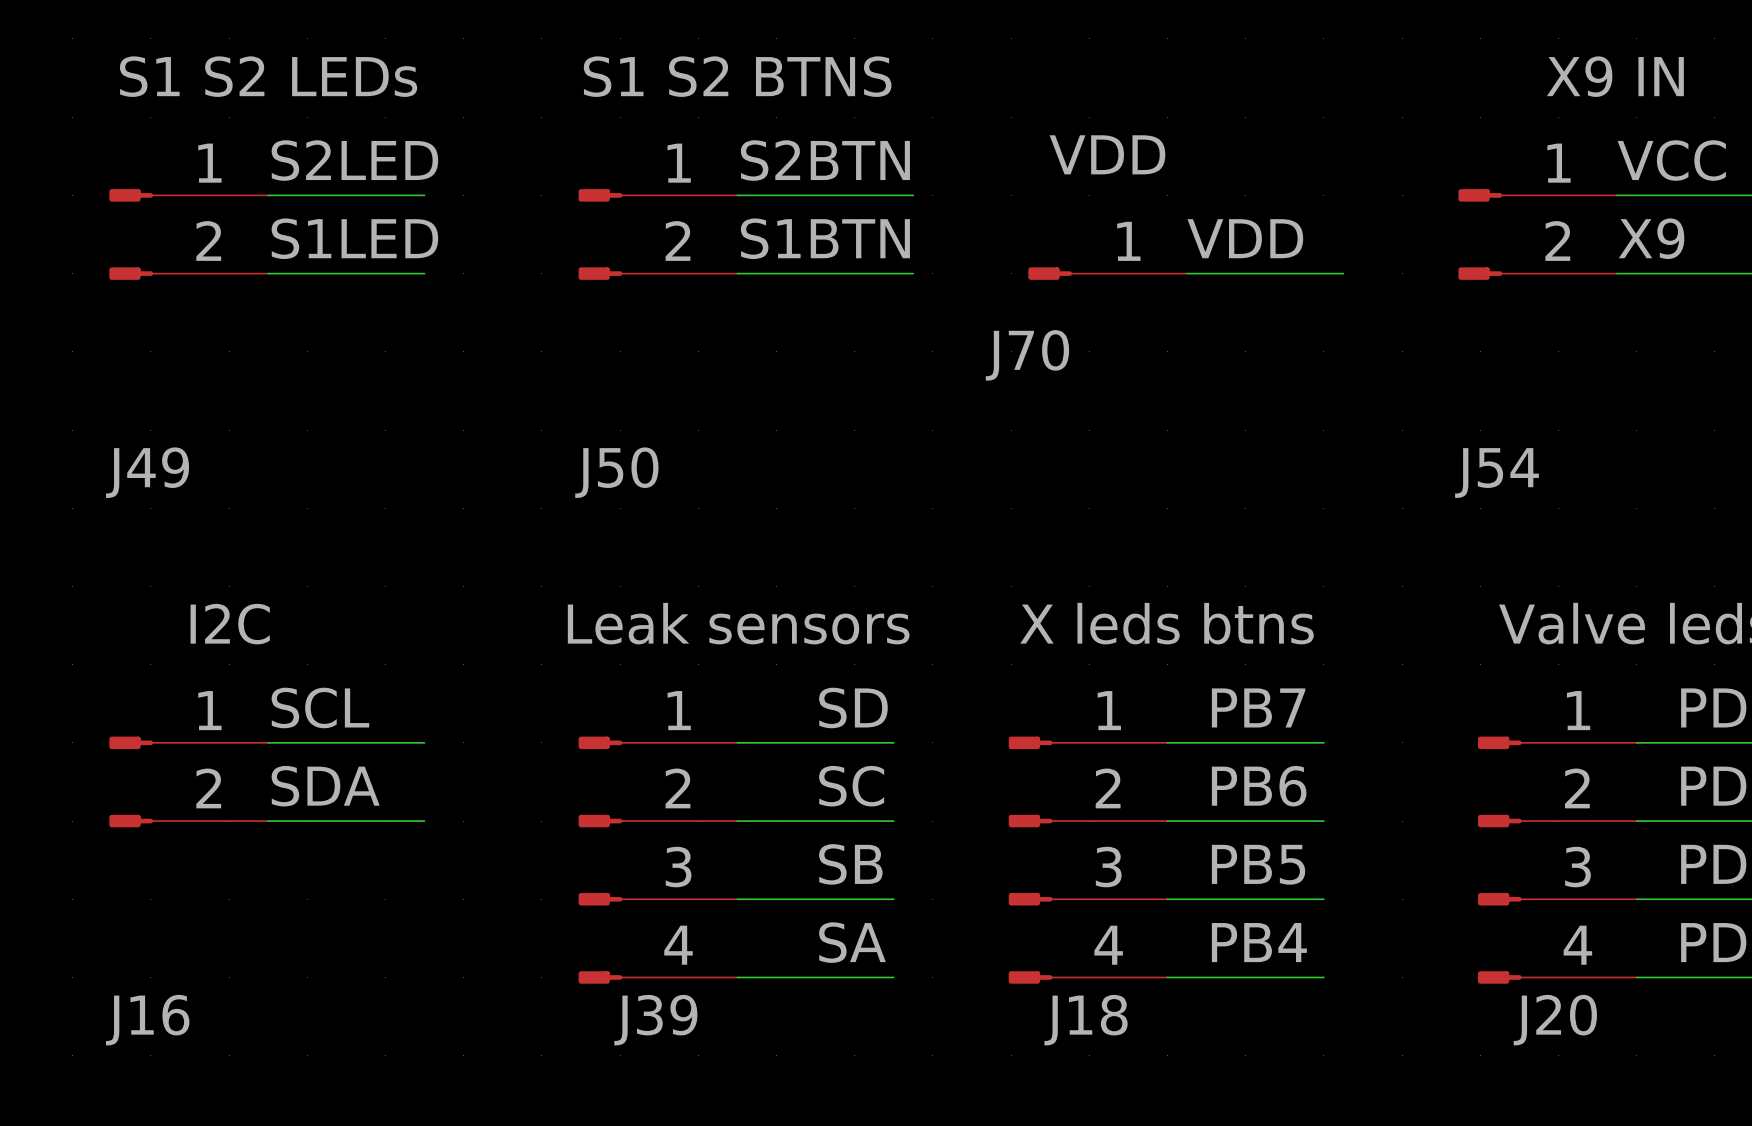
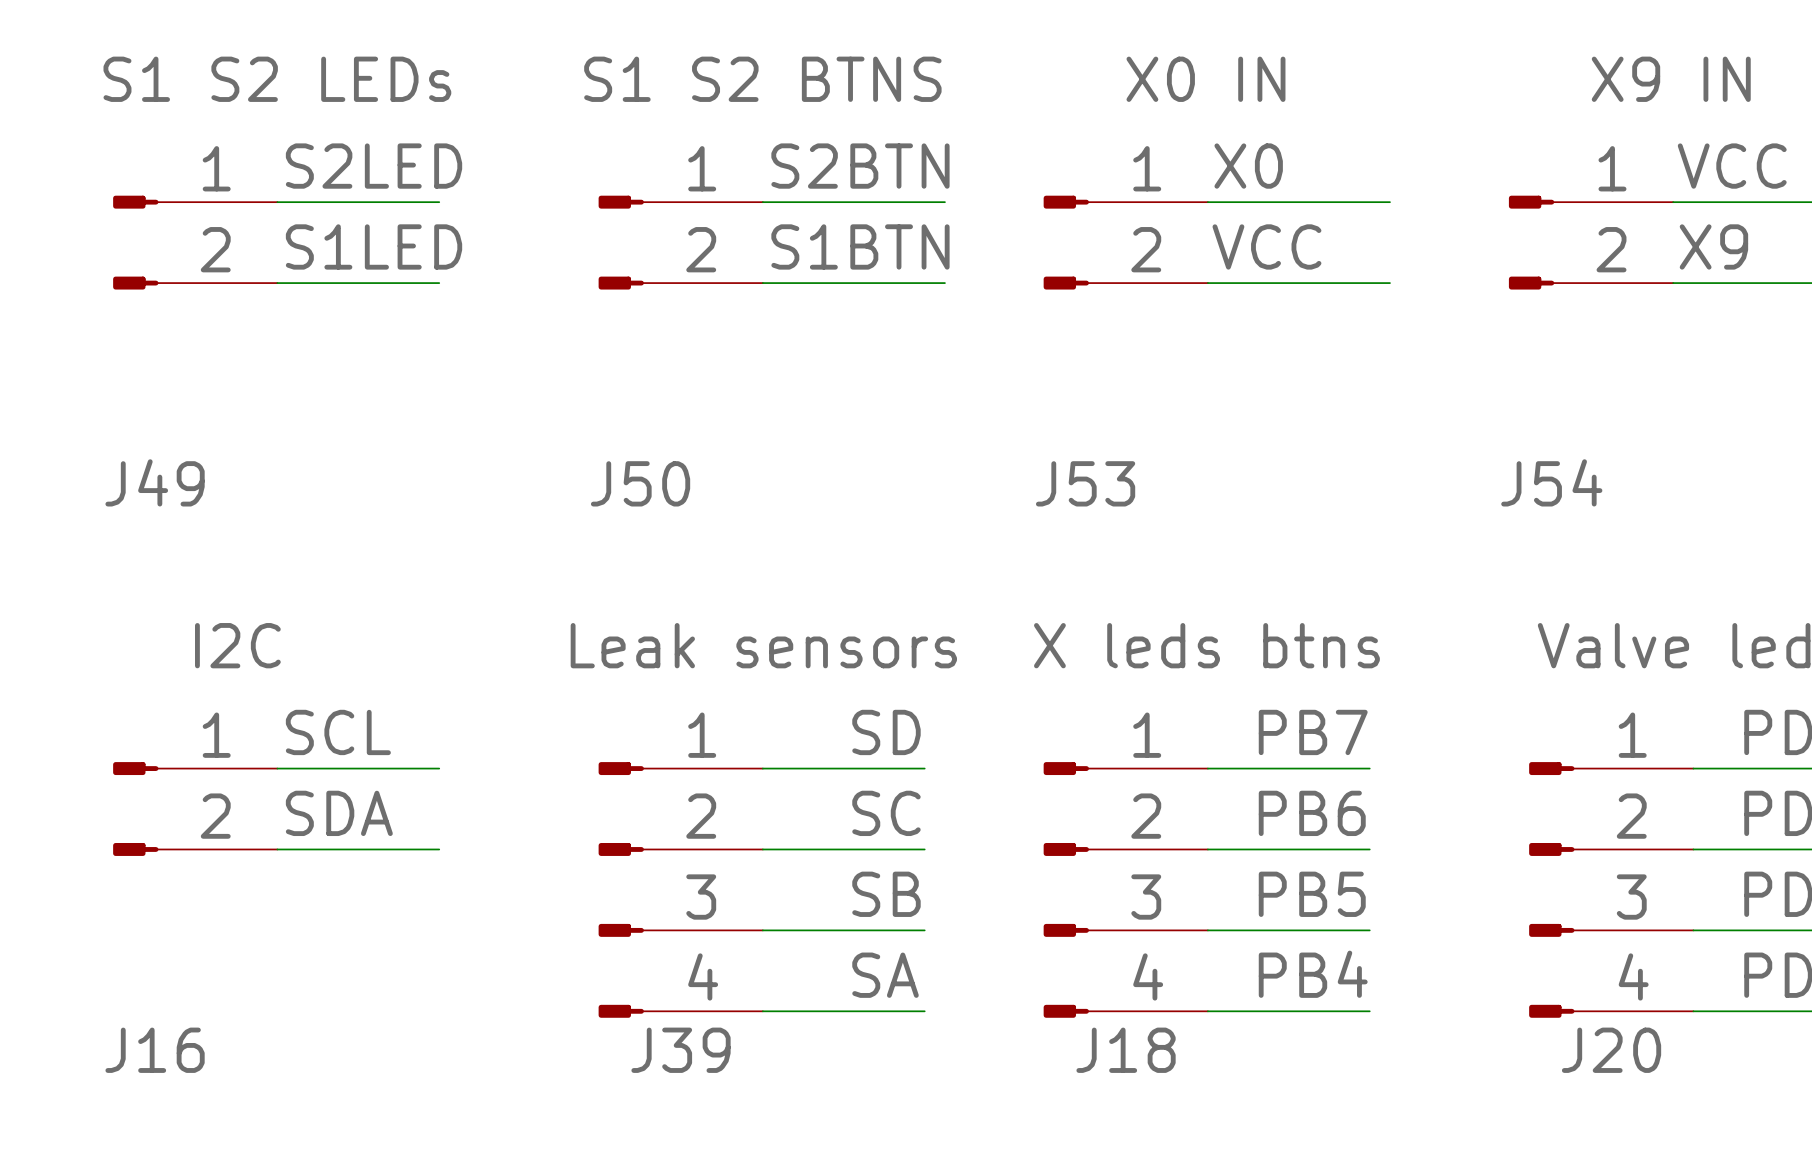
label: none -> X0 (1248, 166)
wire: none -> (1207, 202) (1389, 202)
J53: none -> X0 IN (1125, 242)
label: VDD (1245, 238) -> VCC (1266, 246)
J70: VDD (1107, 273) -> none

